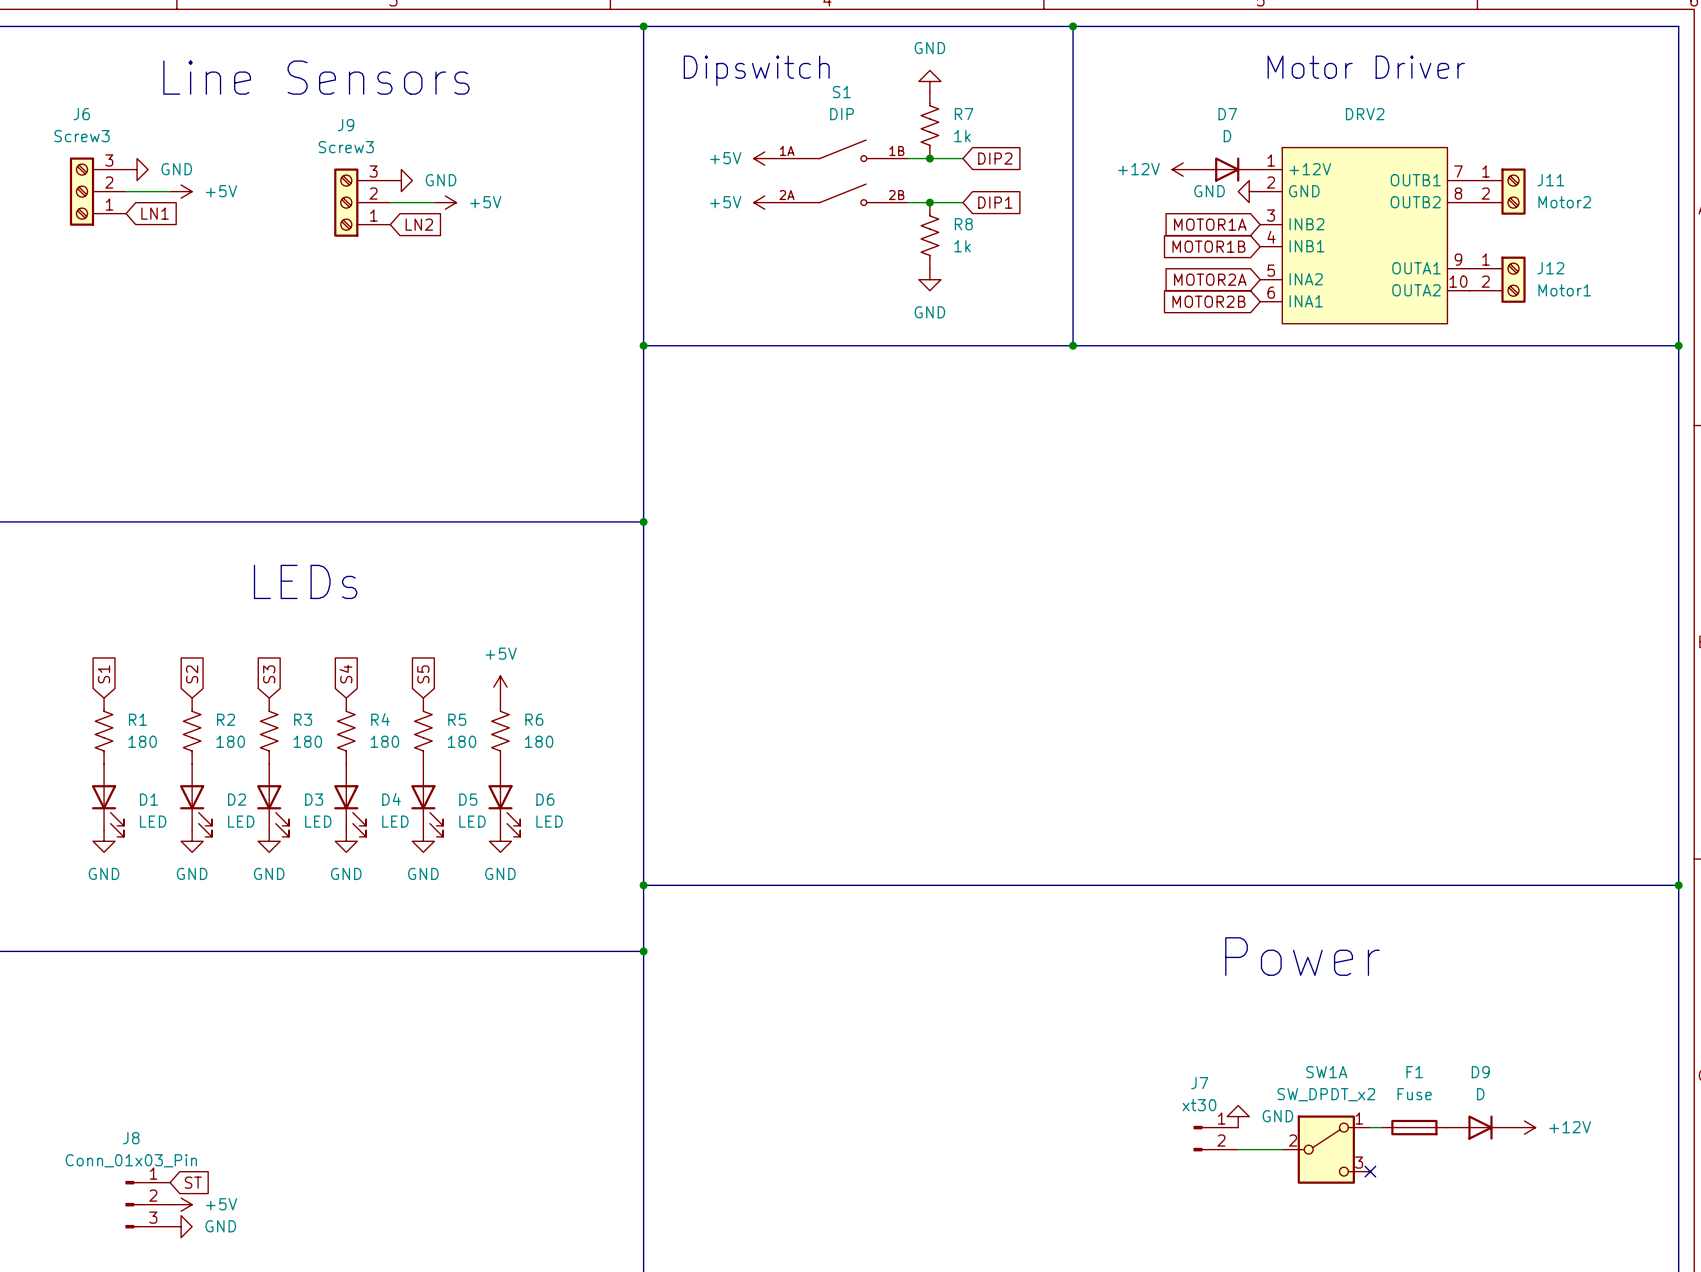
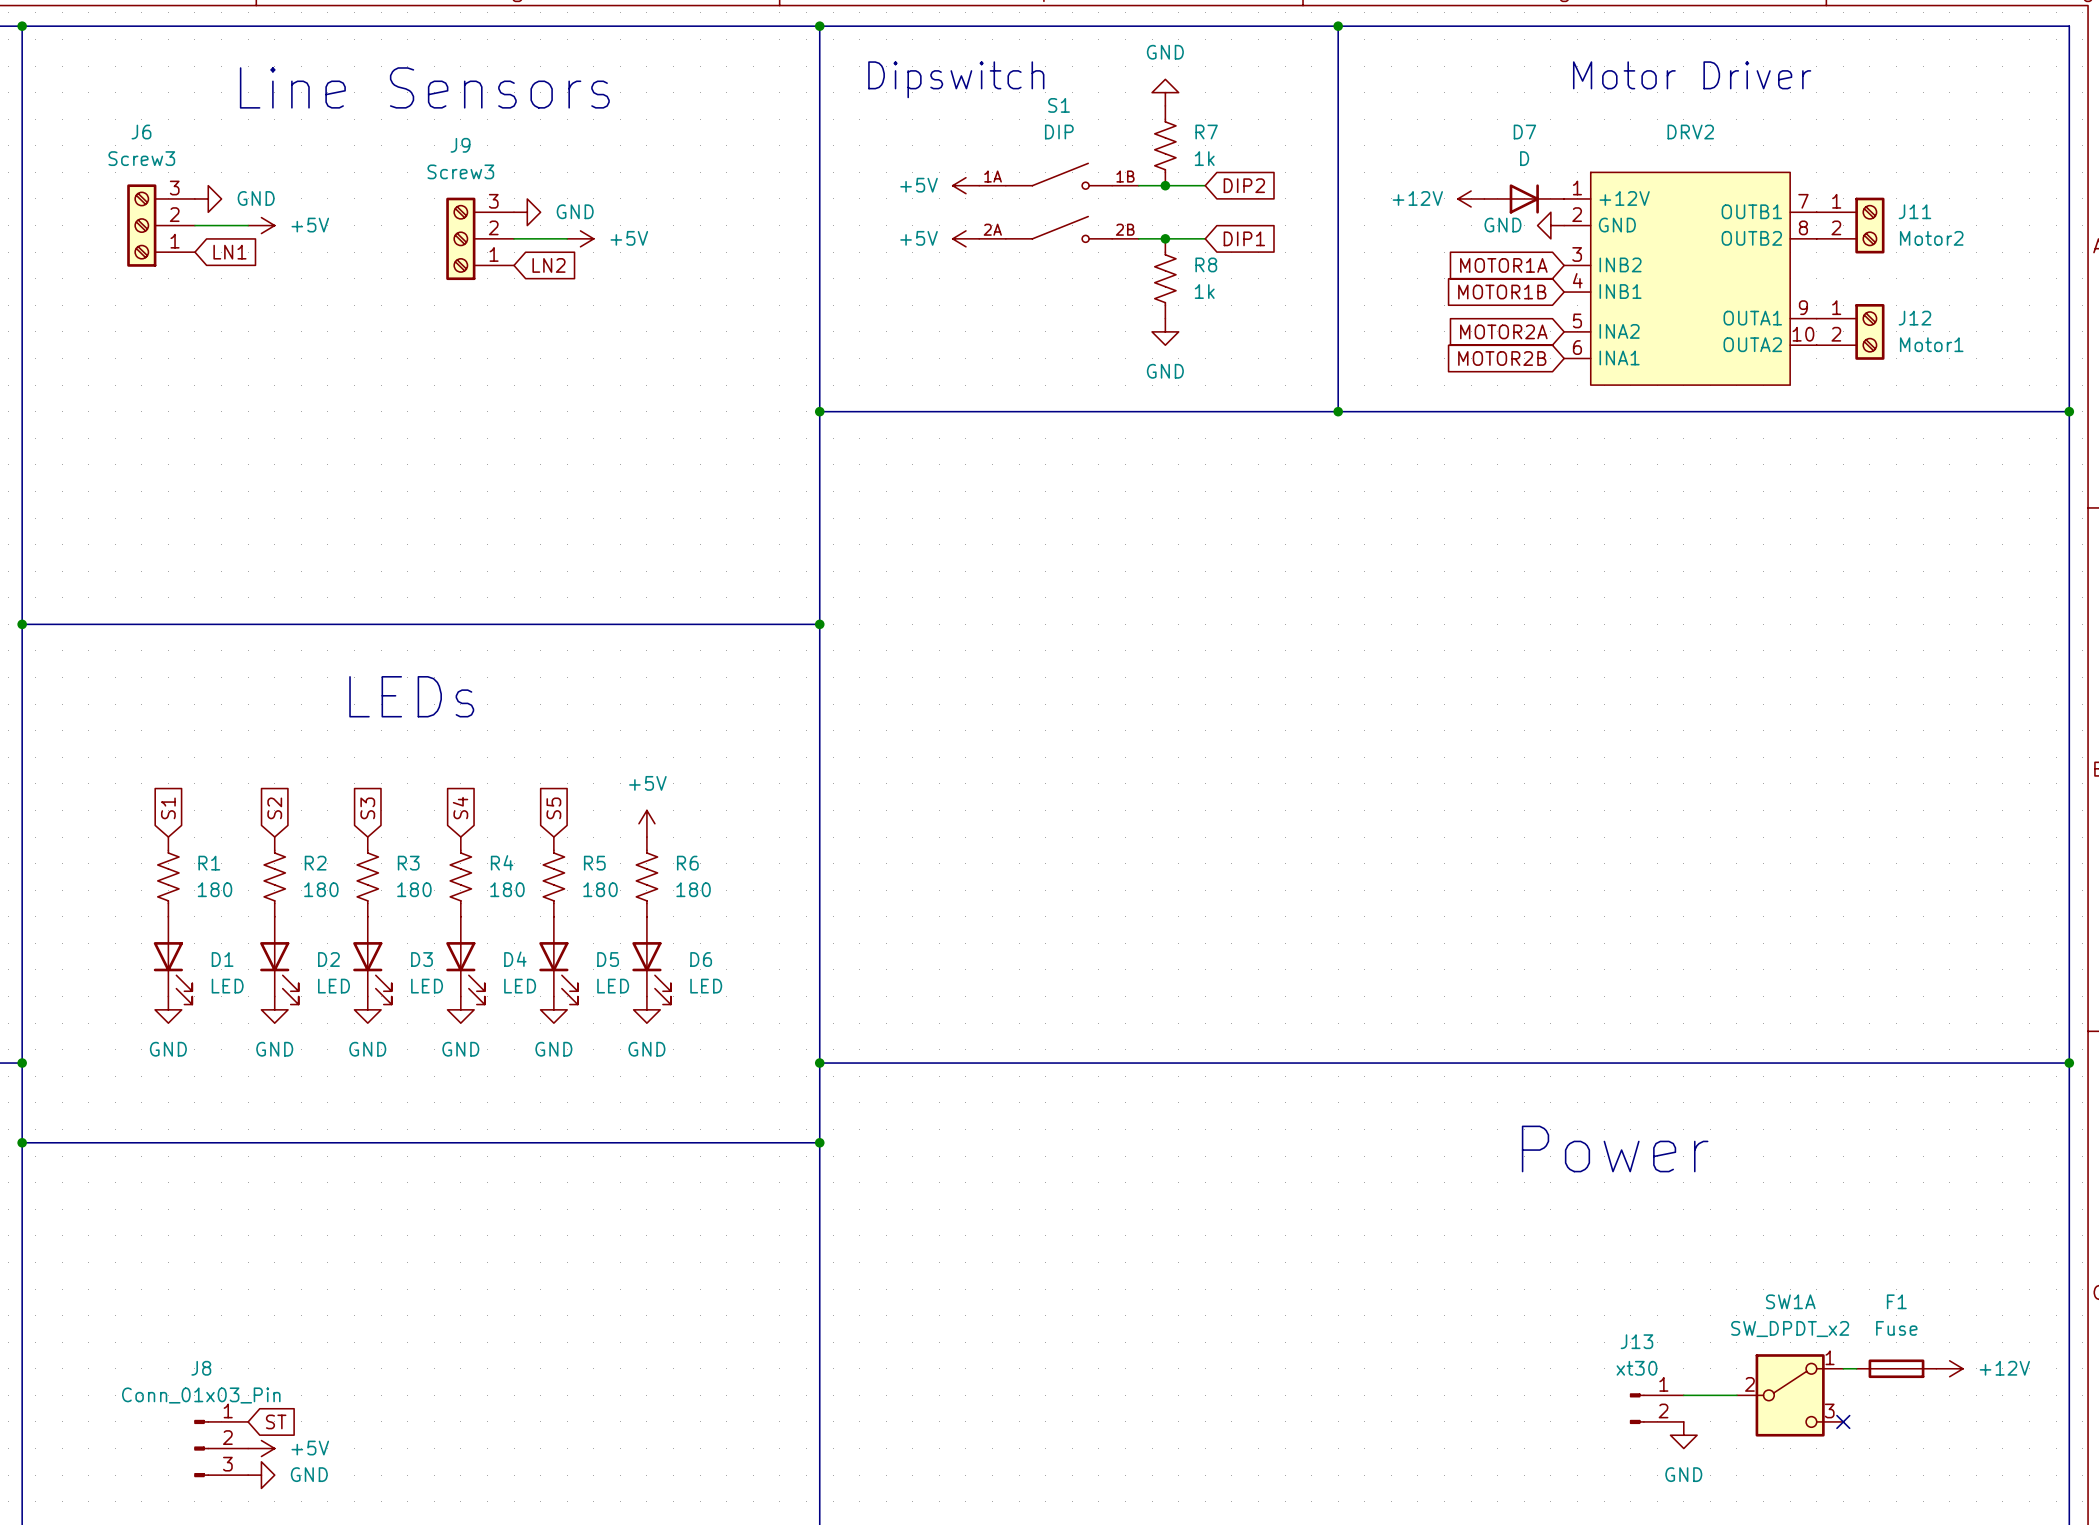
power symbol rotation: 0° (1238, 1116) -> 180° (1683, 1435)
power symbol position: GND (1238, 1116) -> GND (1683, 1435)
power symbol text position: GND (1277, 1116) -> GND (1683, 1474)
wire: (1370, 1127) (1381, 1127) -> (1843, 1368) (1856, 1368)
F1 position: (1414, 1127) -> (1896, 1368)
D9: D (1480, 1127) -> none
power symbol position: +12V (1524, 1127) -> +12V (1949, 1368)
J7: xt30 (1215, 1138) -> none
wire: (1238, 1149) (1282, 1149) -> (1683, 1395) (1736, 1395)
SW1A position: (1326, 1149) -> (1790, 1395)
J13: none -> xt30 (1656, 1408)
no-connect mark: (1370, 1171) -> none
no-connect mark: none -> (1843, 1421)

